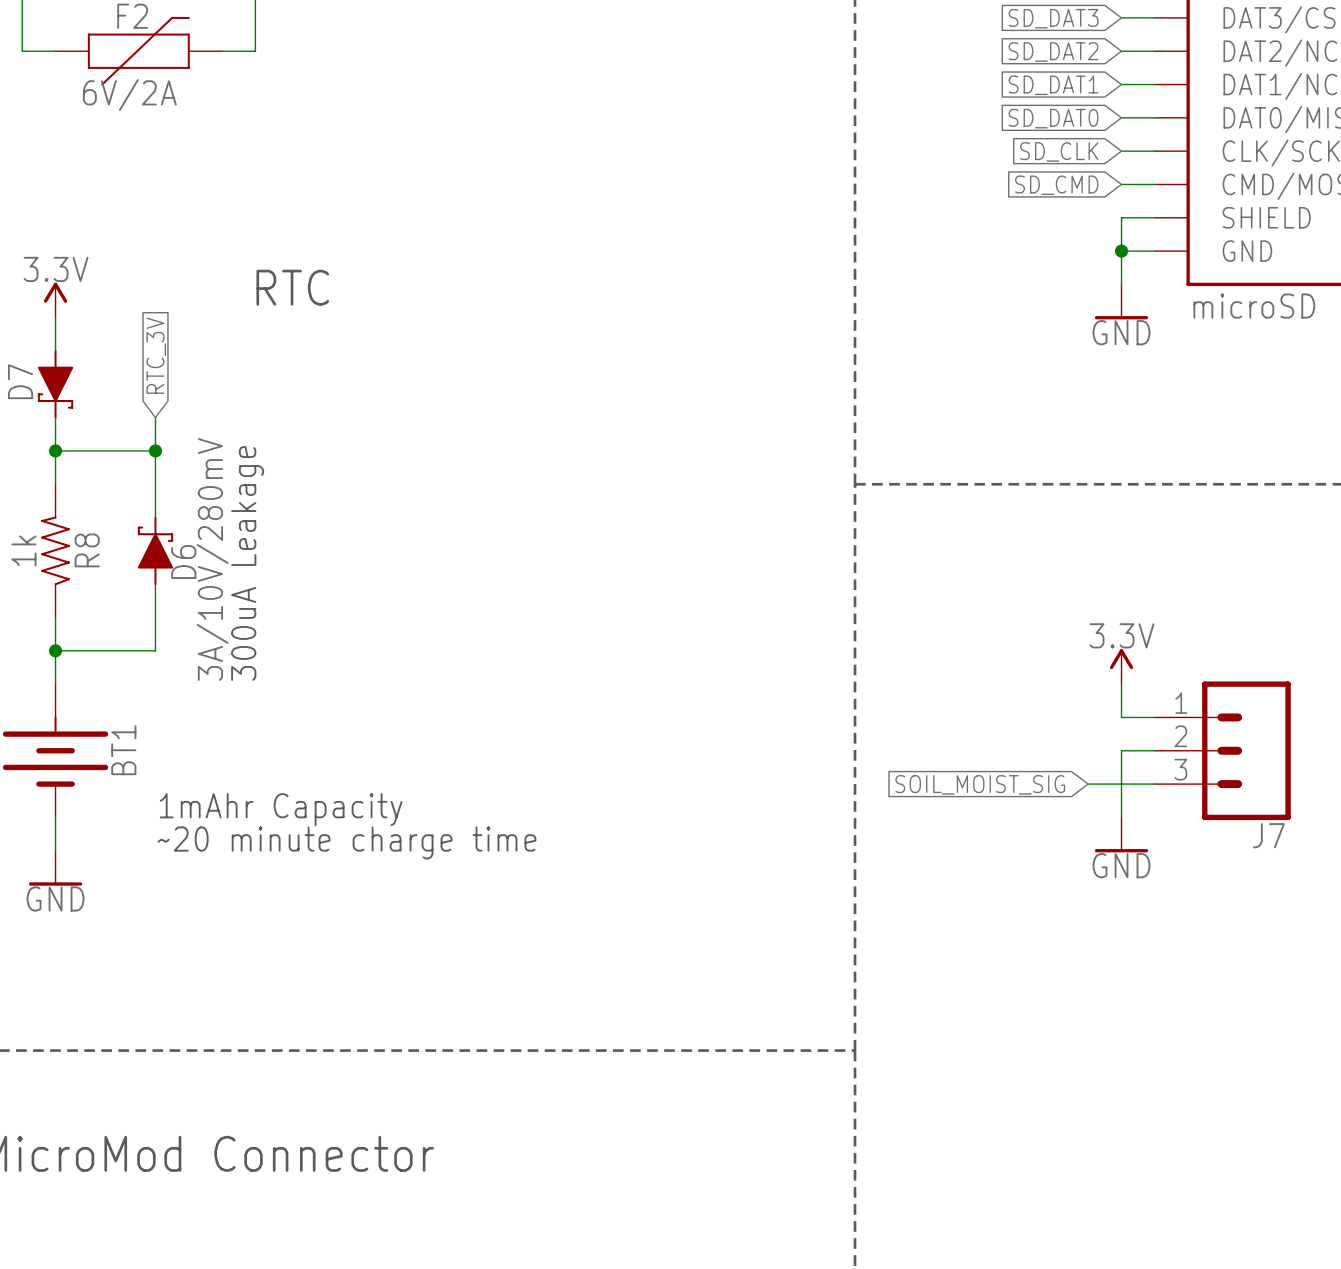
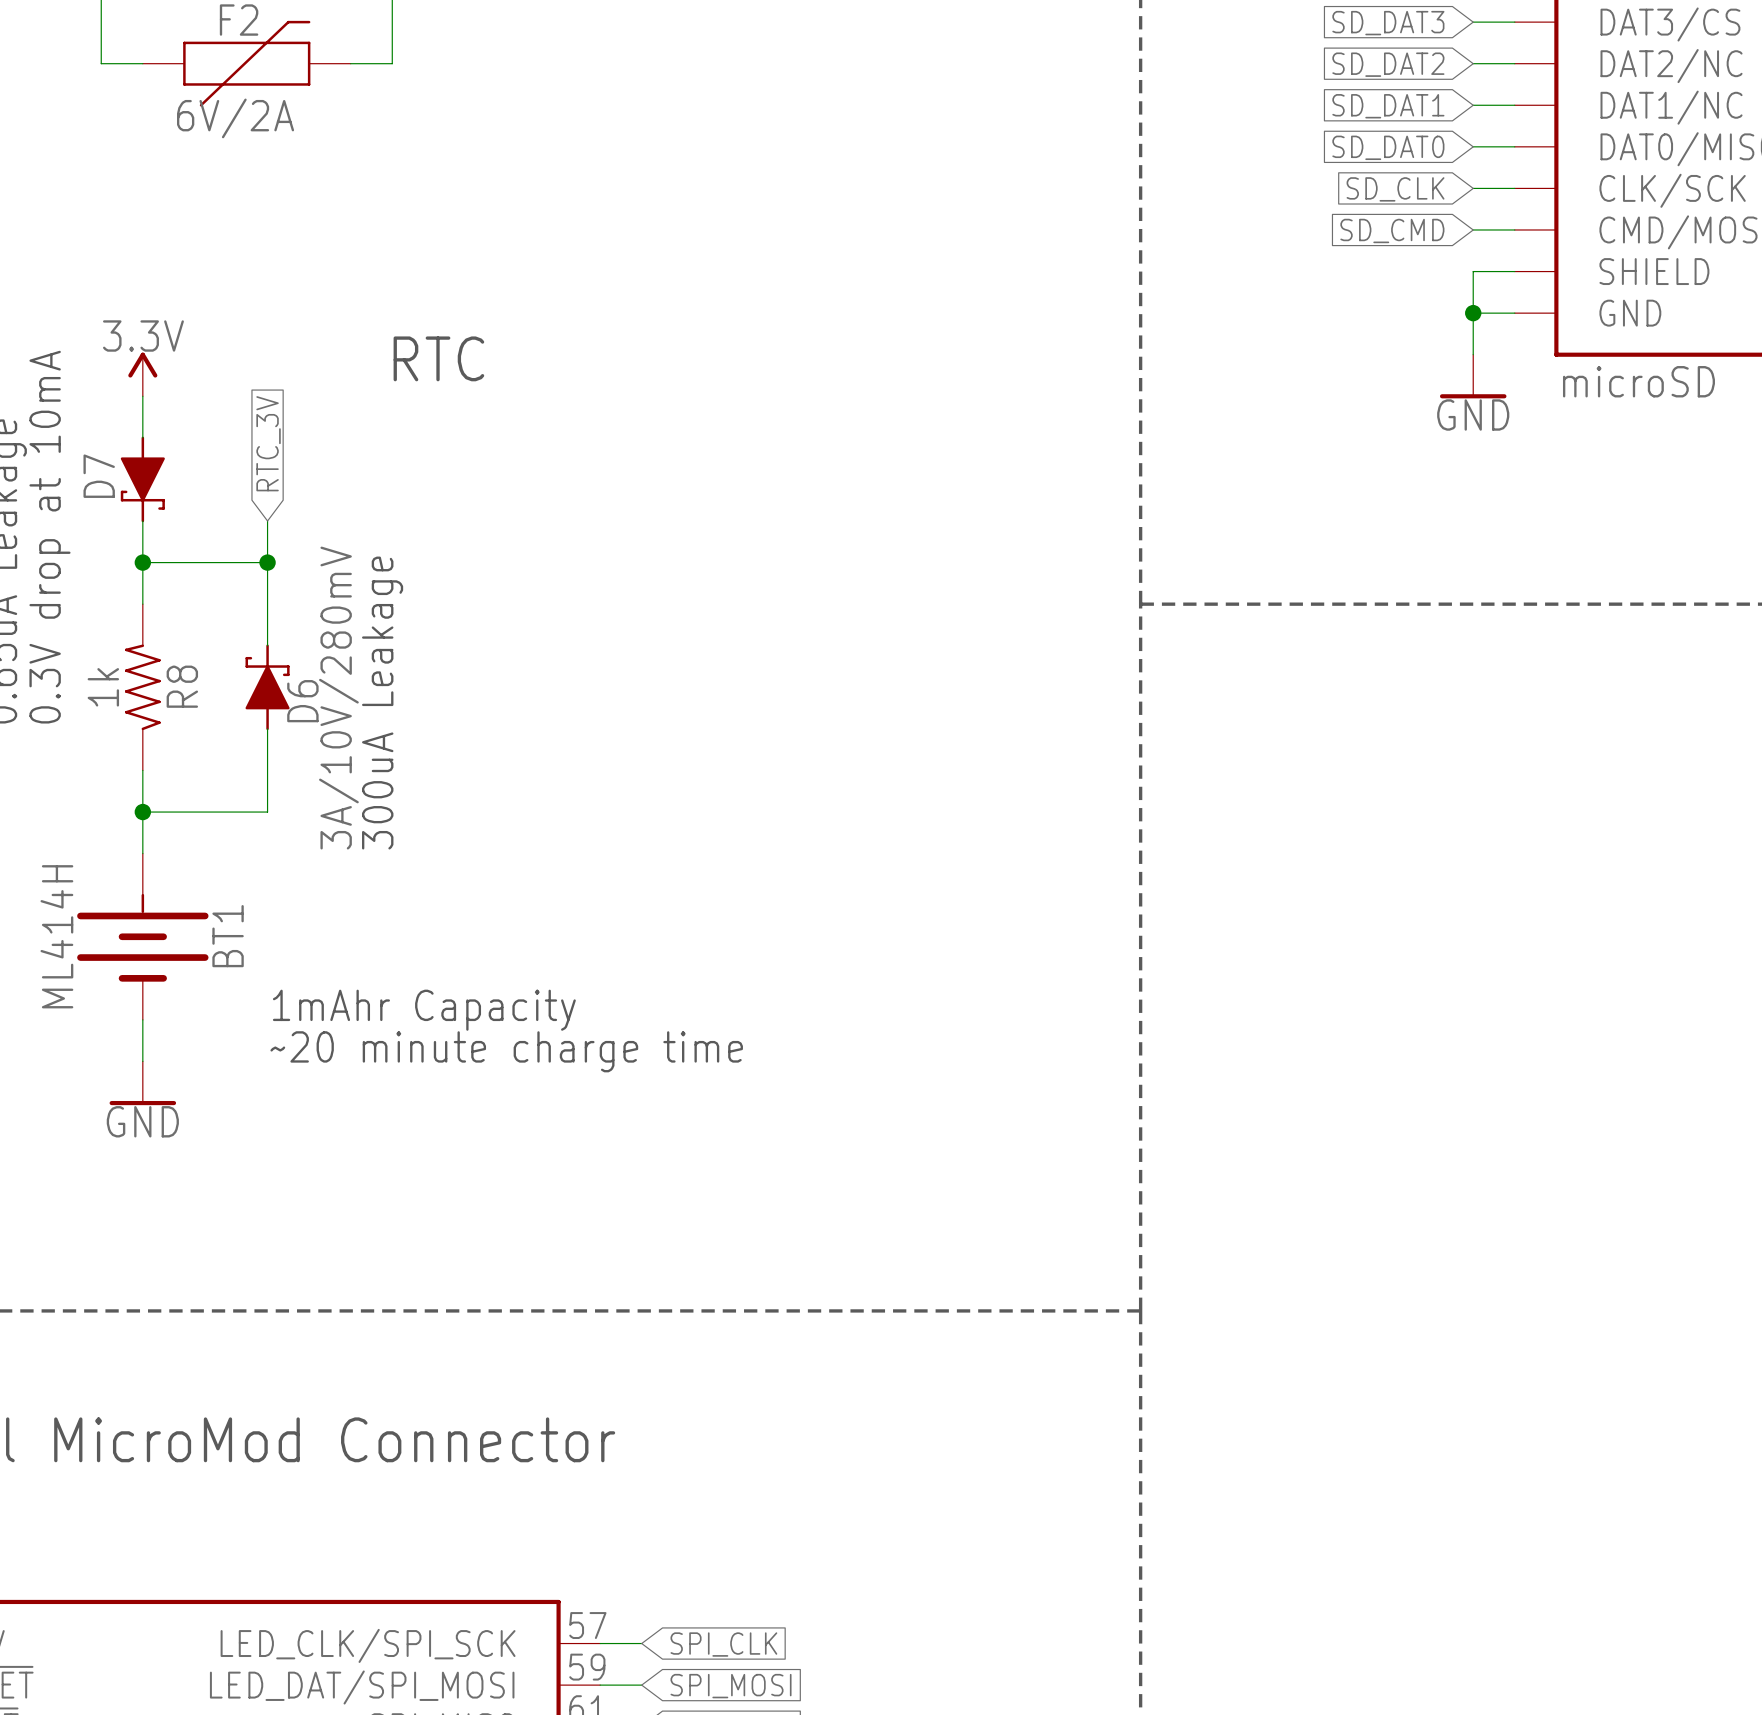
power symbol: 3.3V (1121, 666) -> none
wire: (1121, 684) (1121, 717) (1154, 717) -> none
wire: (1154, 750) (1121, 750) (1121, 817) -> none
J7: (1222, 750) -> none
global label: SOIL_MOIST_SIG (980, 784) -> none
wire: (1088, 784) (1154, 784) -> none
power symbol: GND (1121, 834) -> none

